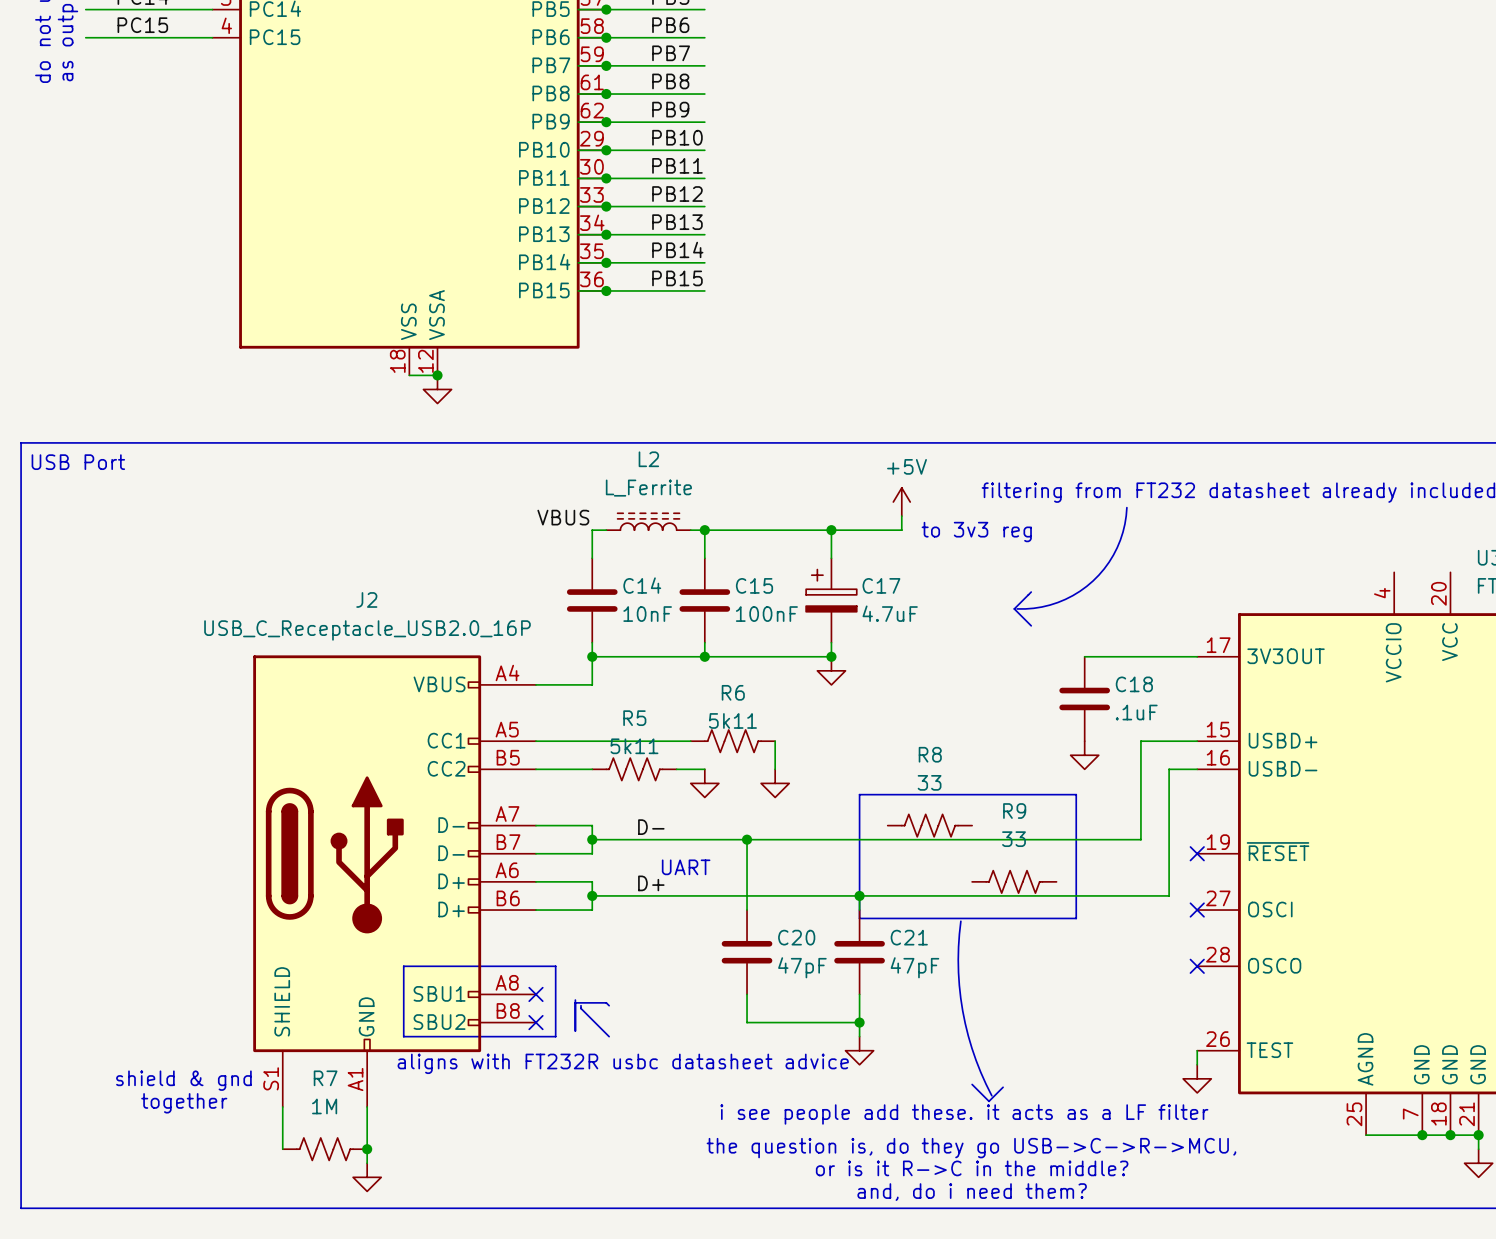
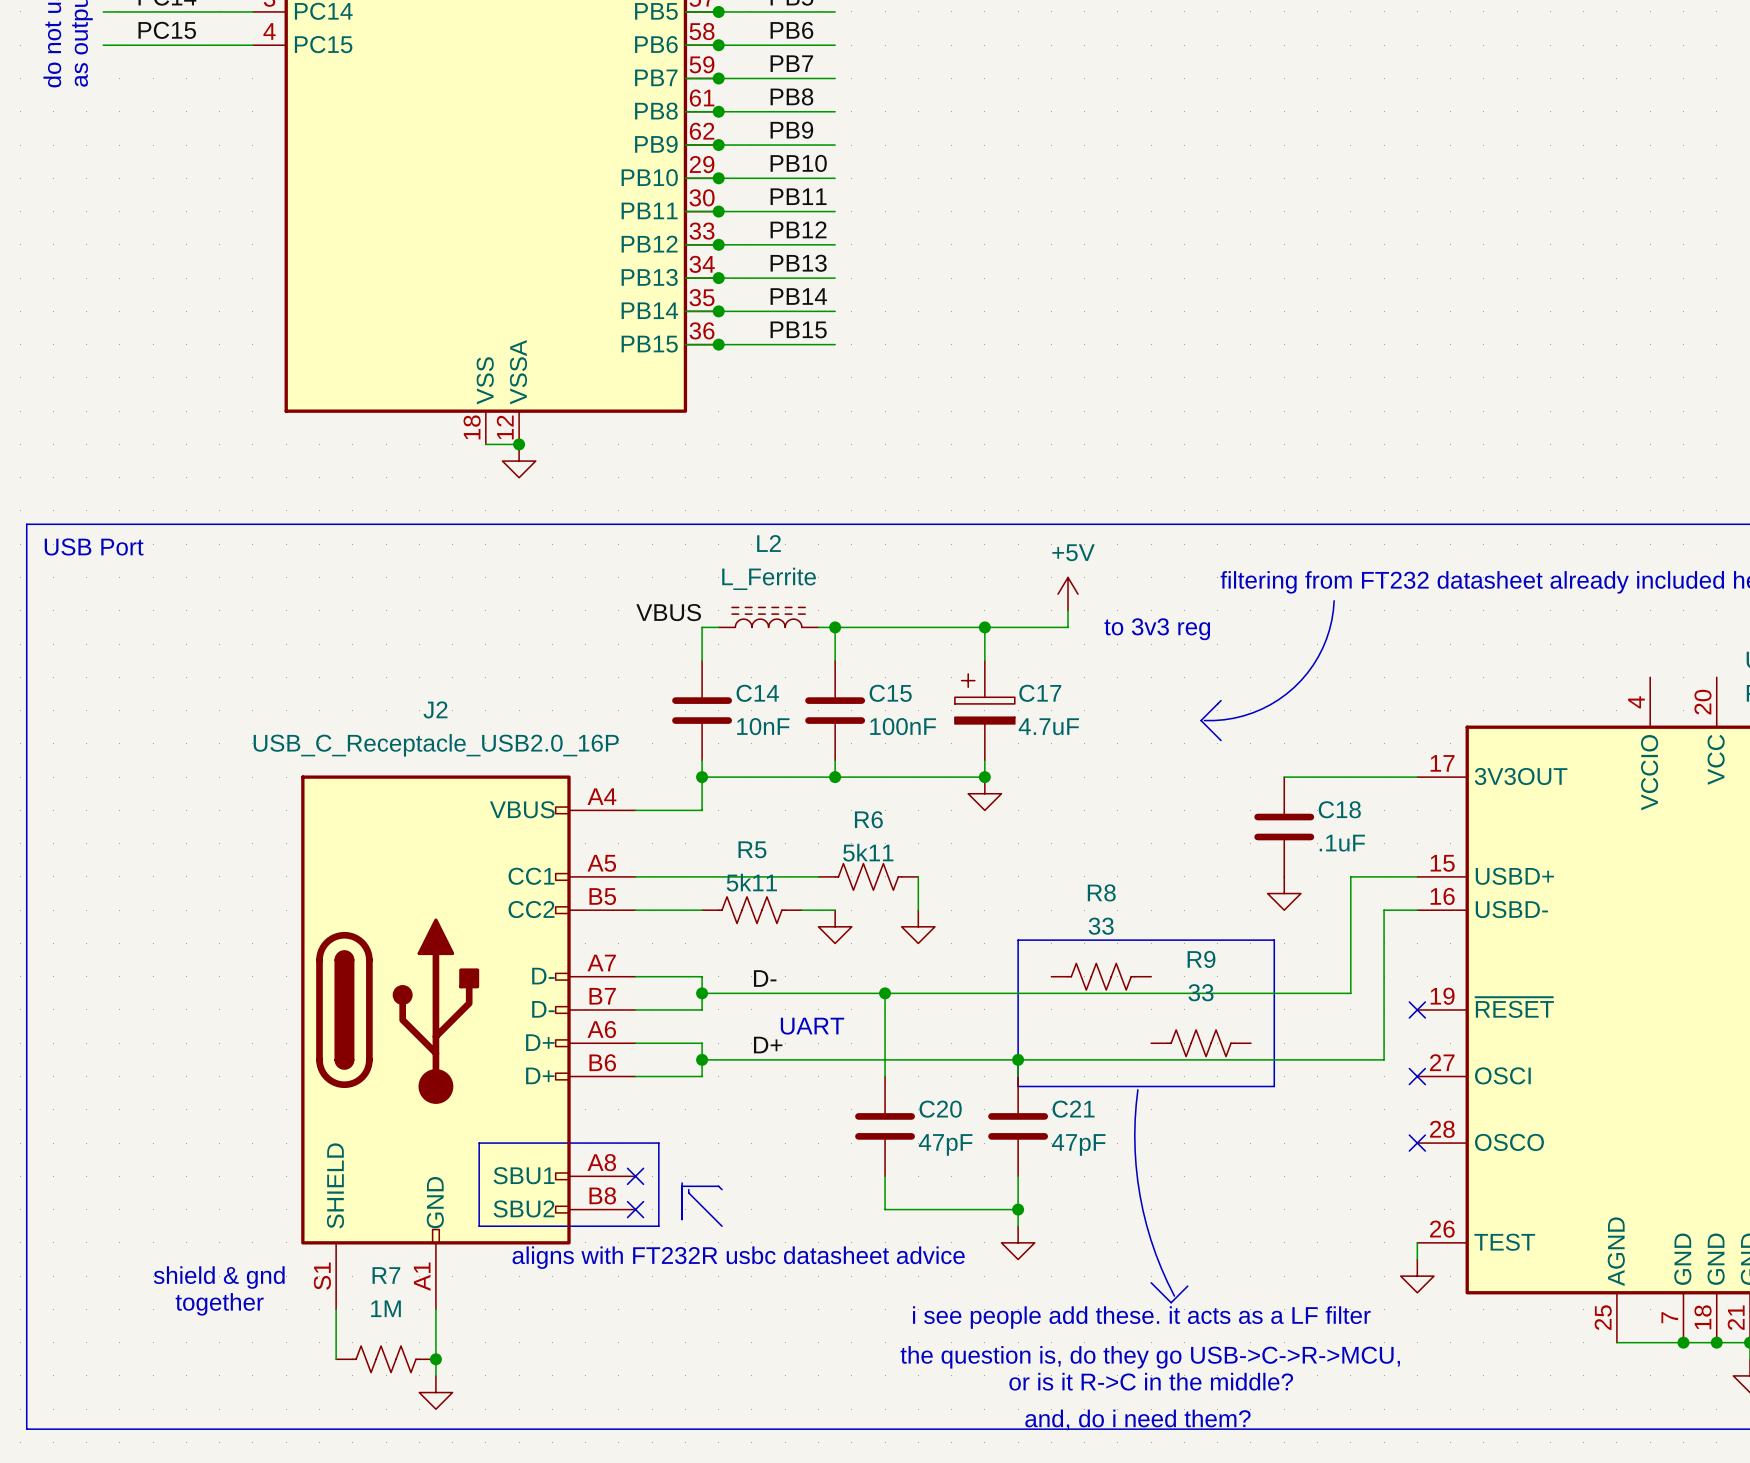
text position: and, do i need them? (972, 1192) -> and, do i need them? (1137, 1419)

